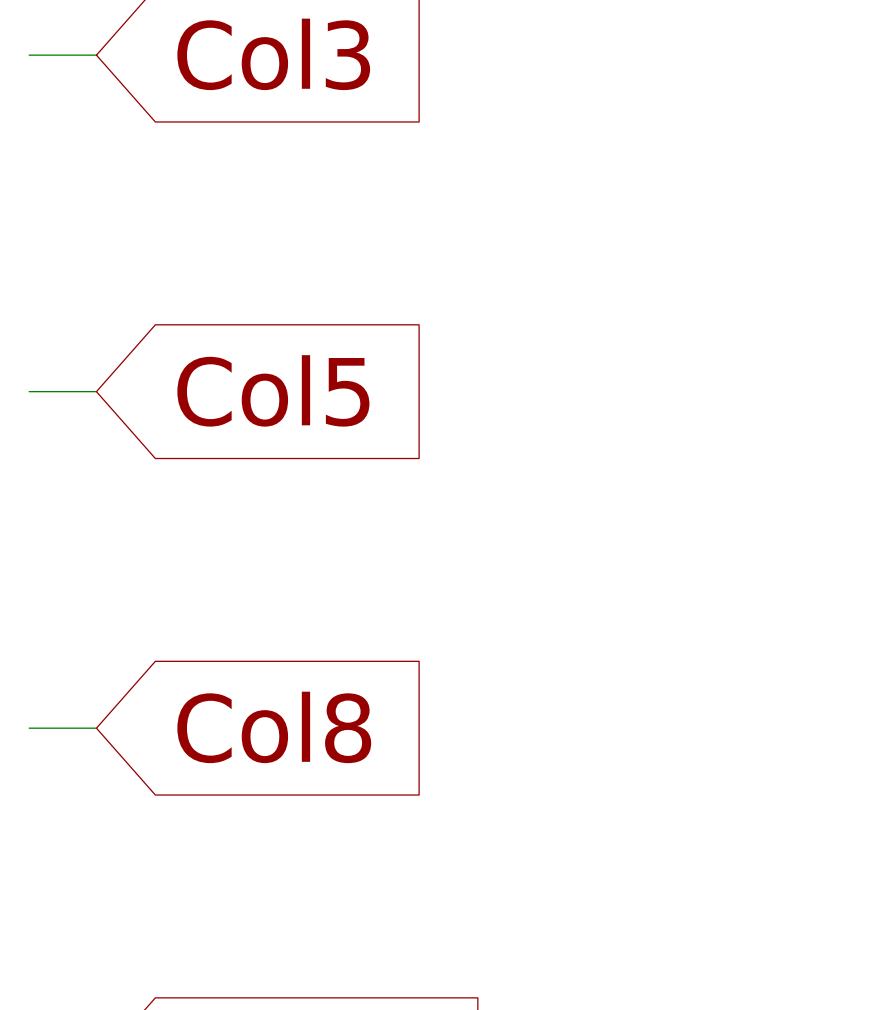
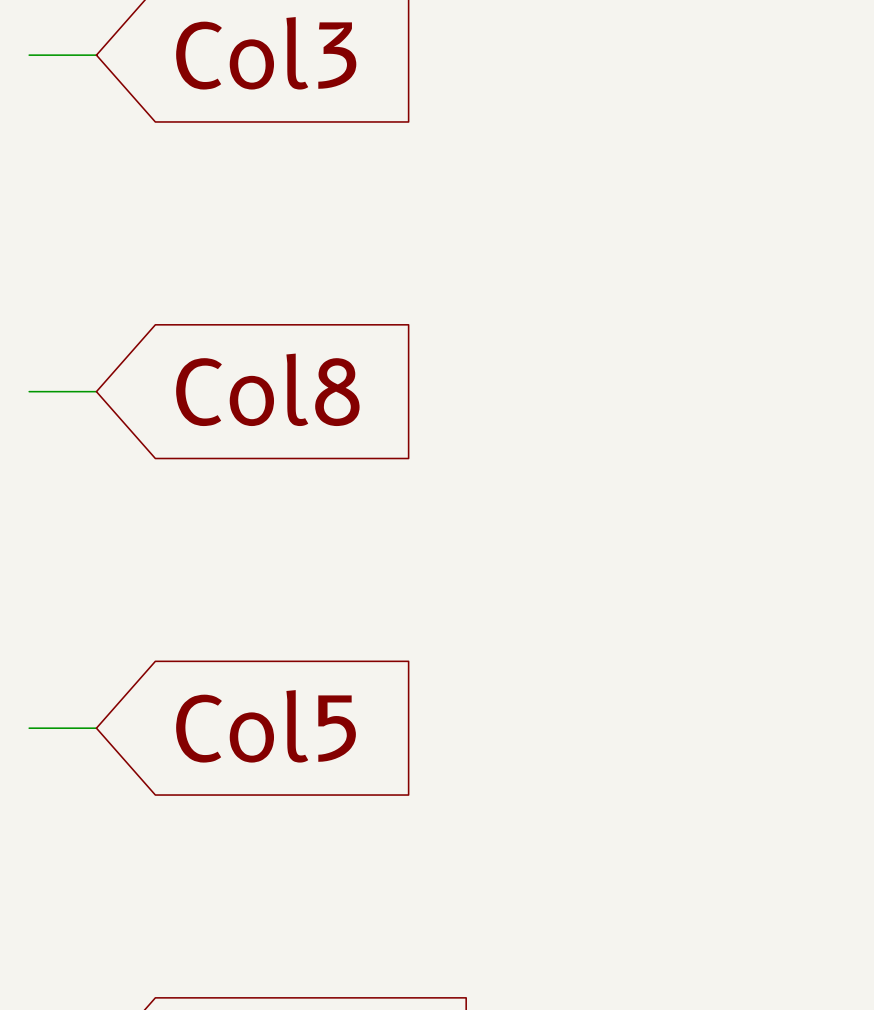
global label: Col5 (273, 390) -> Col8 (267, 389)
global label: Col8 (274, 727) -> Col5 (266, 726)

